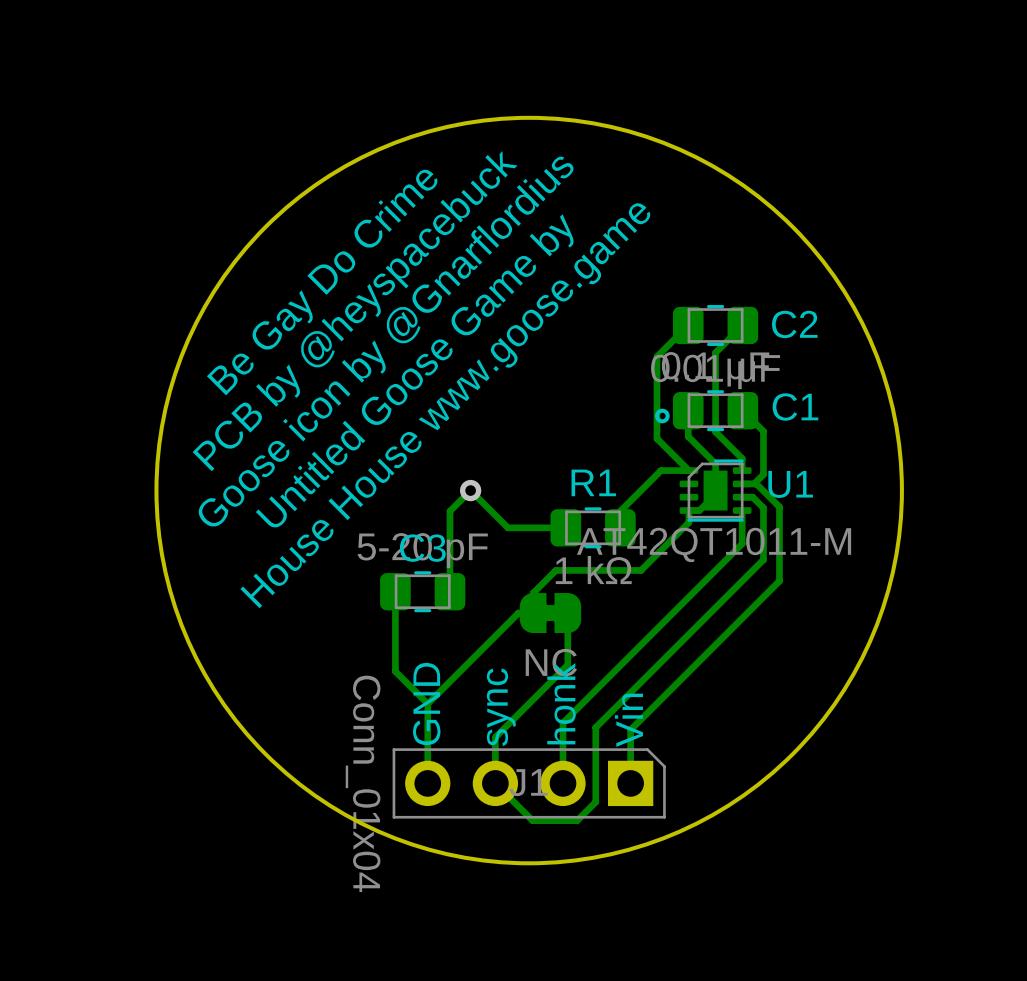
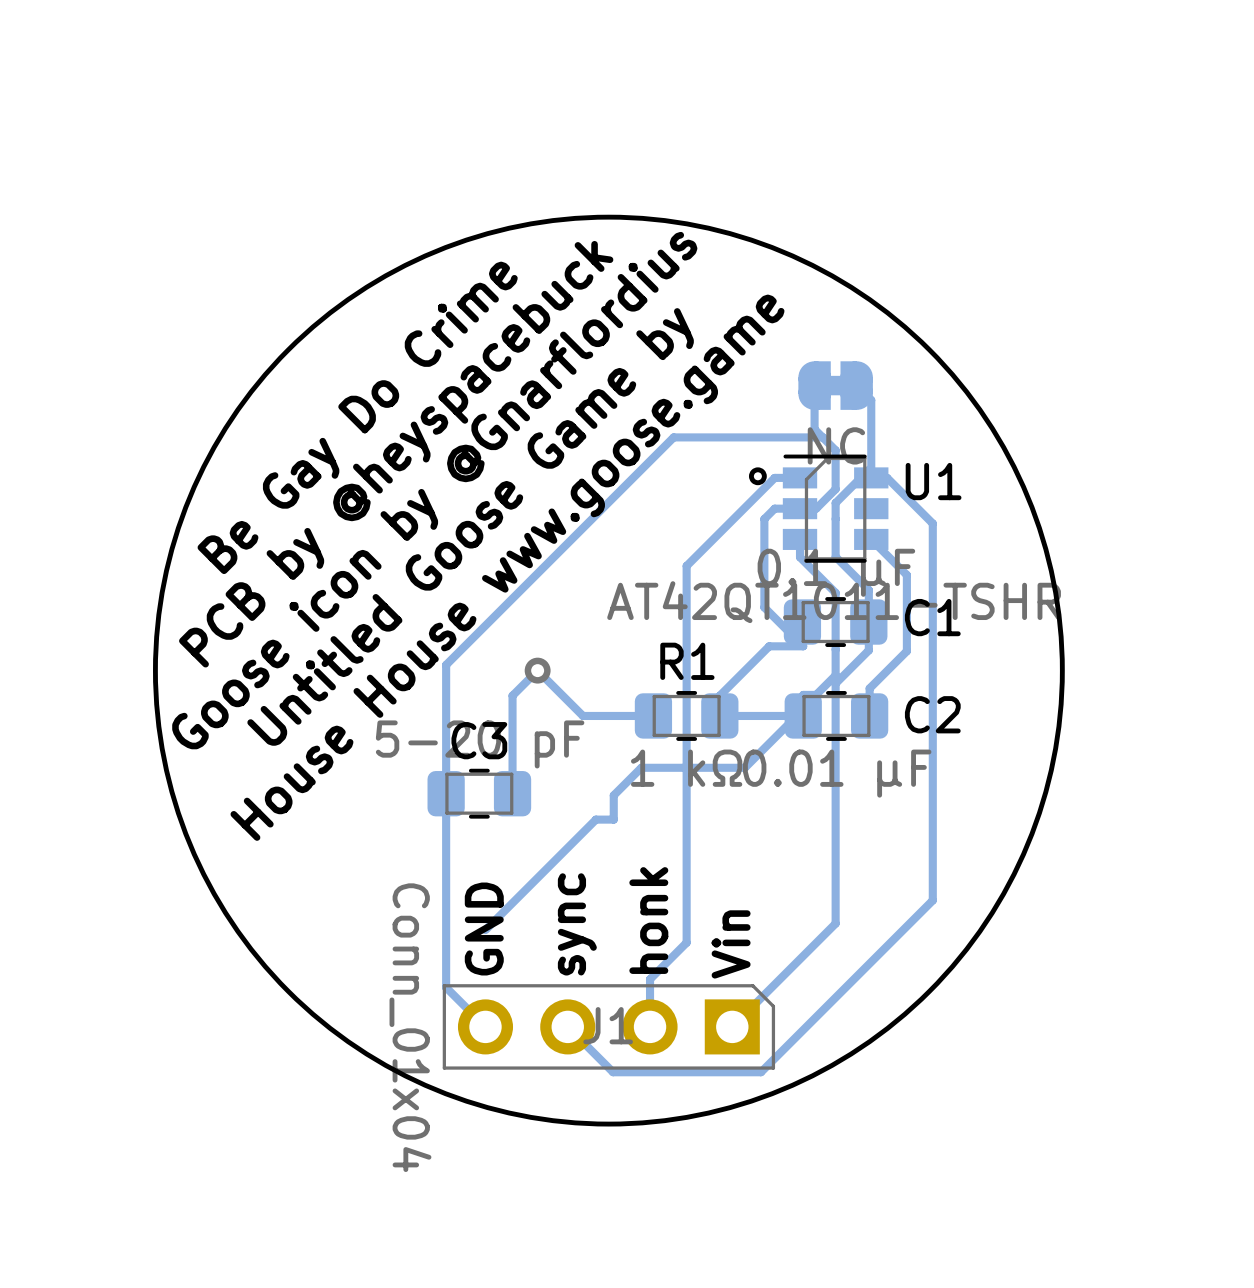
track: none -> (822, 437) (673, 437) (446, 664) (446, 793)
track: (688, 325) (656, 356) (656, 365) -> (814, 385) (814, 429) (835, 450) (835, 489) (816, 508) (774, 508) (764, 519)
C2 position: (715, 325) -> (836, 715)
track: none -> (871, 539) (906, 575) (906, 651) (869, 688) (869, 719)
track: (715, 397) (715, 426) -> (800, 539) (800, 557) (835, 592)
track: (688, 410) (688, 436) (715, 463) -> none
C1 position: (715, 410) -> (835, 622)
track: (742, 410) (763, 431) (763, 474) (754, 483) -> none
drawing position: (662, 416) -> (757, 476)
track: (715, 431) (742, 458) (742, 470) -> (835, 599) (835, 638)
U1 footprint: [679, 459, 752, 522] -> [782, 454, 889, 563]
track: (742, 483) (756, 483) (779, 506) (779, 581) (630, 729) (630, 783) -> (835, 556) (868, 590) (868, 650) (835, 683) (835, 923) (732, 1026)
track: (742, 497) (752, 497) (763, 507) (763, 559) (595, 727) (595, 802) (577, 820) -> (856, 385) (871, 400) (871, 477) (887, 477) (932, 523) (932, 900) (760, 1072) (667, 1072)
track: (742, 510) (742, 543) (563, 722) (563, 744) -> (800, 477) (774, 477) (686, 565) (686, 942) (650, 979)
track: none -> (803, 715) (719, 715)
U1 value: AT42QT1011-M (714, 544) -> AT42QT1011-TSHR (834, 602)
part position: (550, 613) -> (835, 385)
track: (567, 613) (567, 664) (495, 737) (495, 783) -> none
track: (395, 671) (427, 703) (427, 783) -> (446, 890) (446, 987) (485, 1026)

